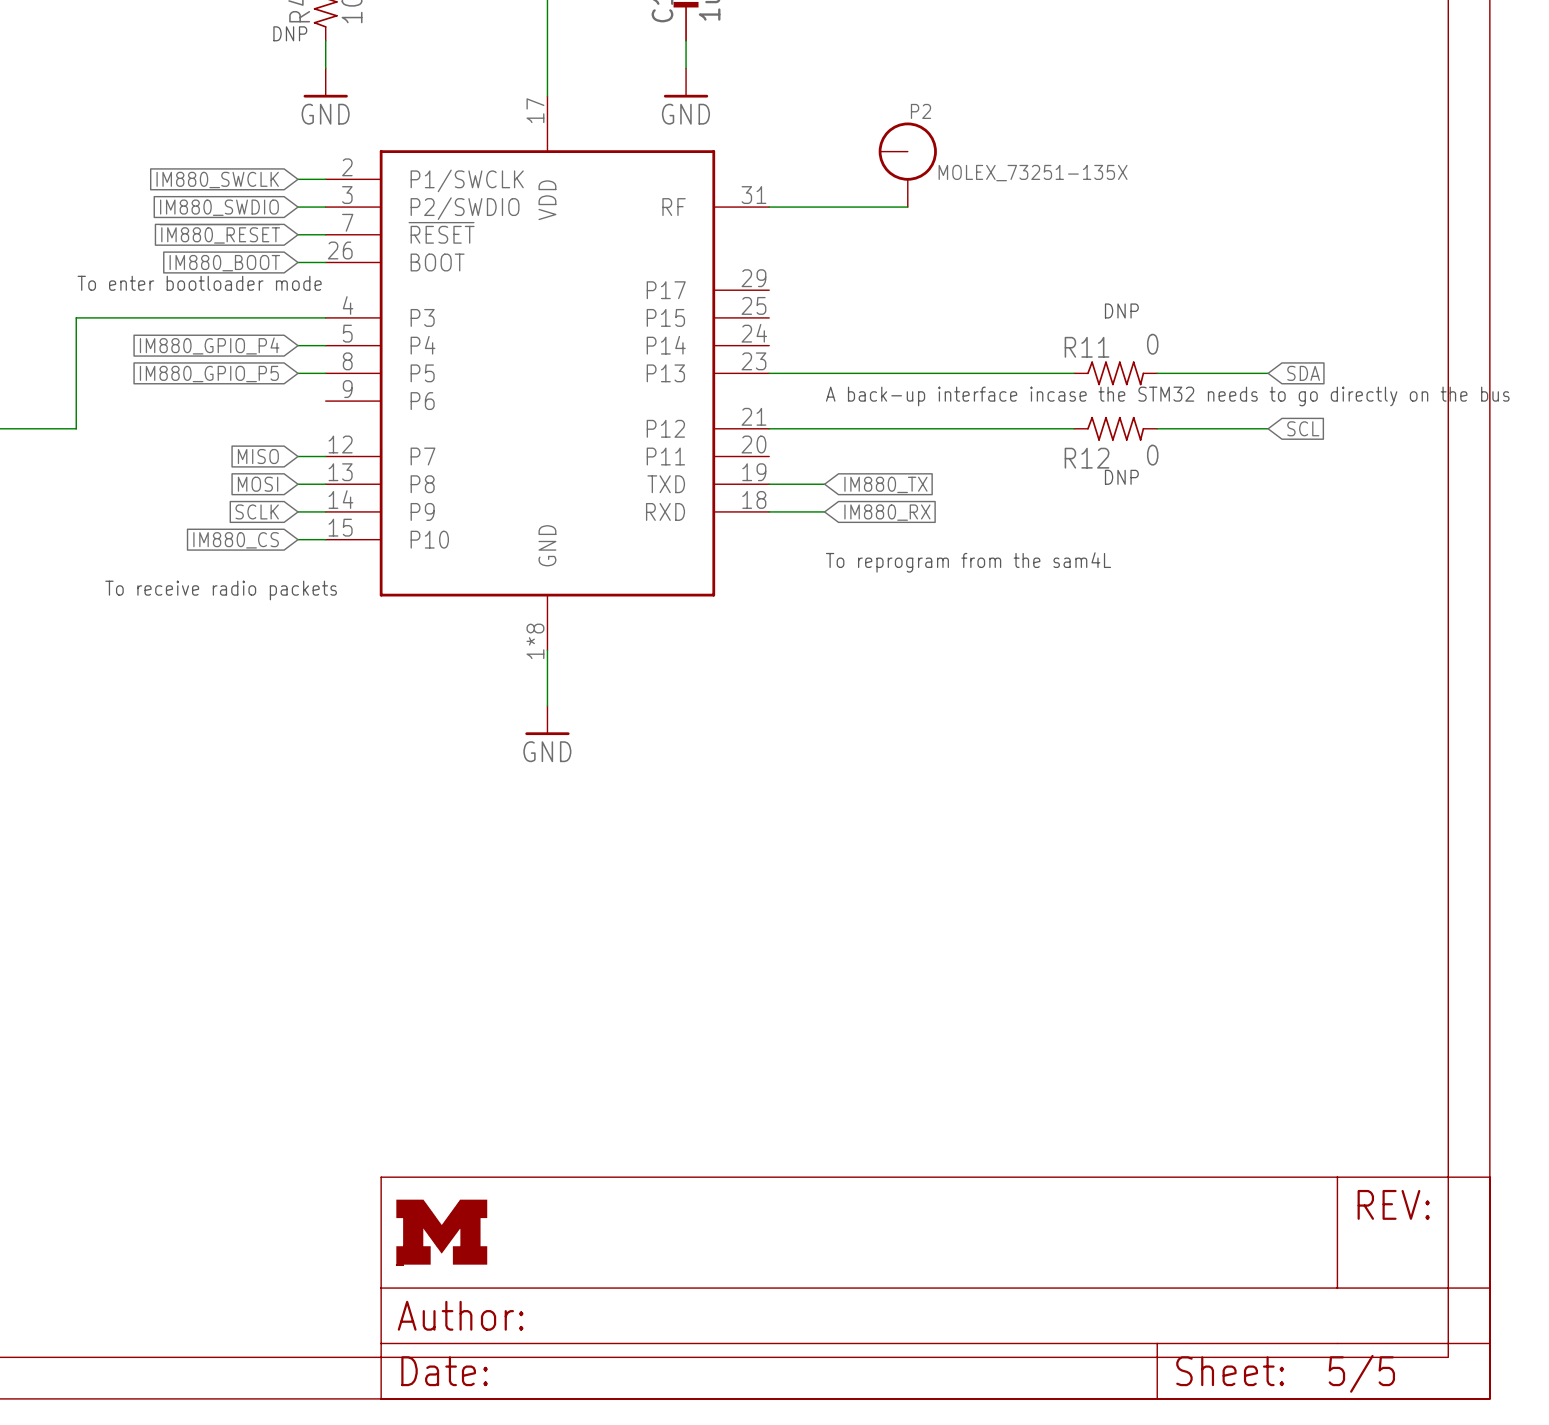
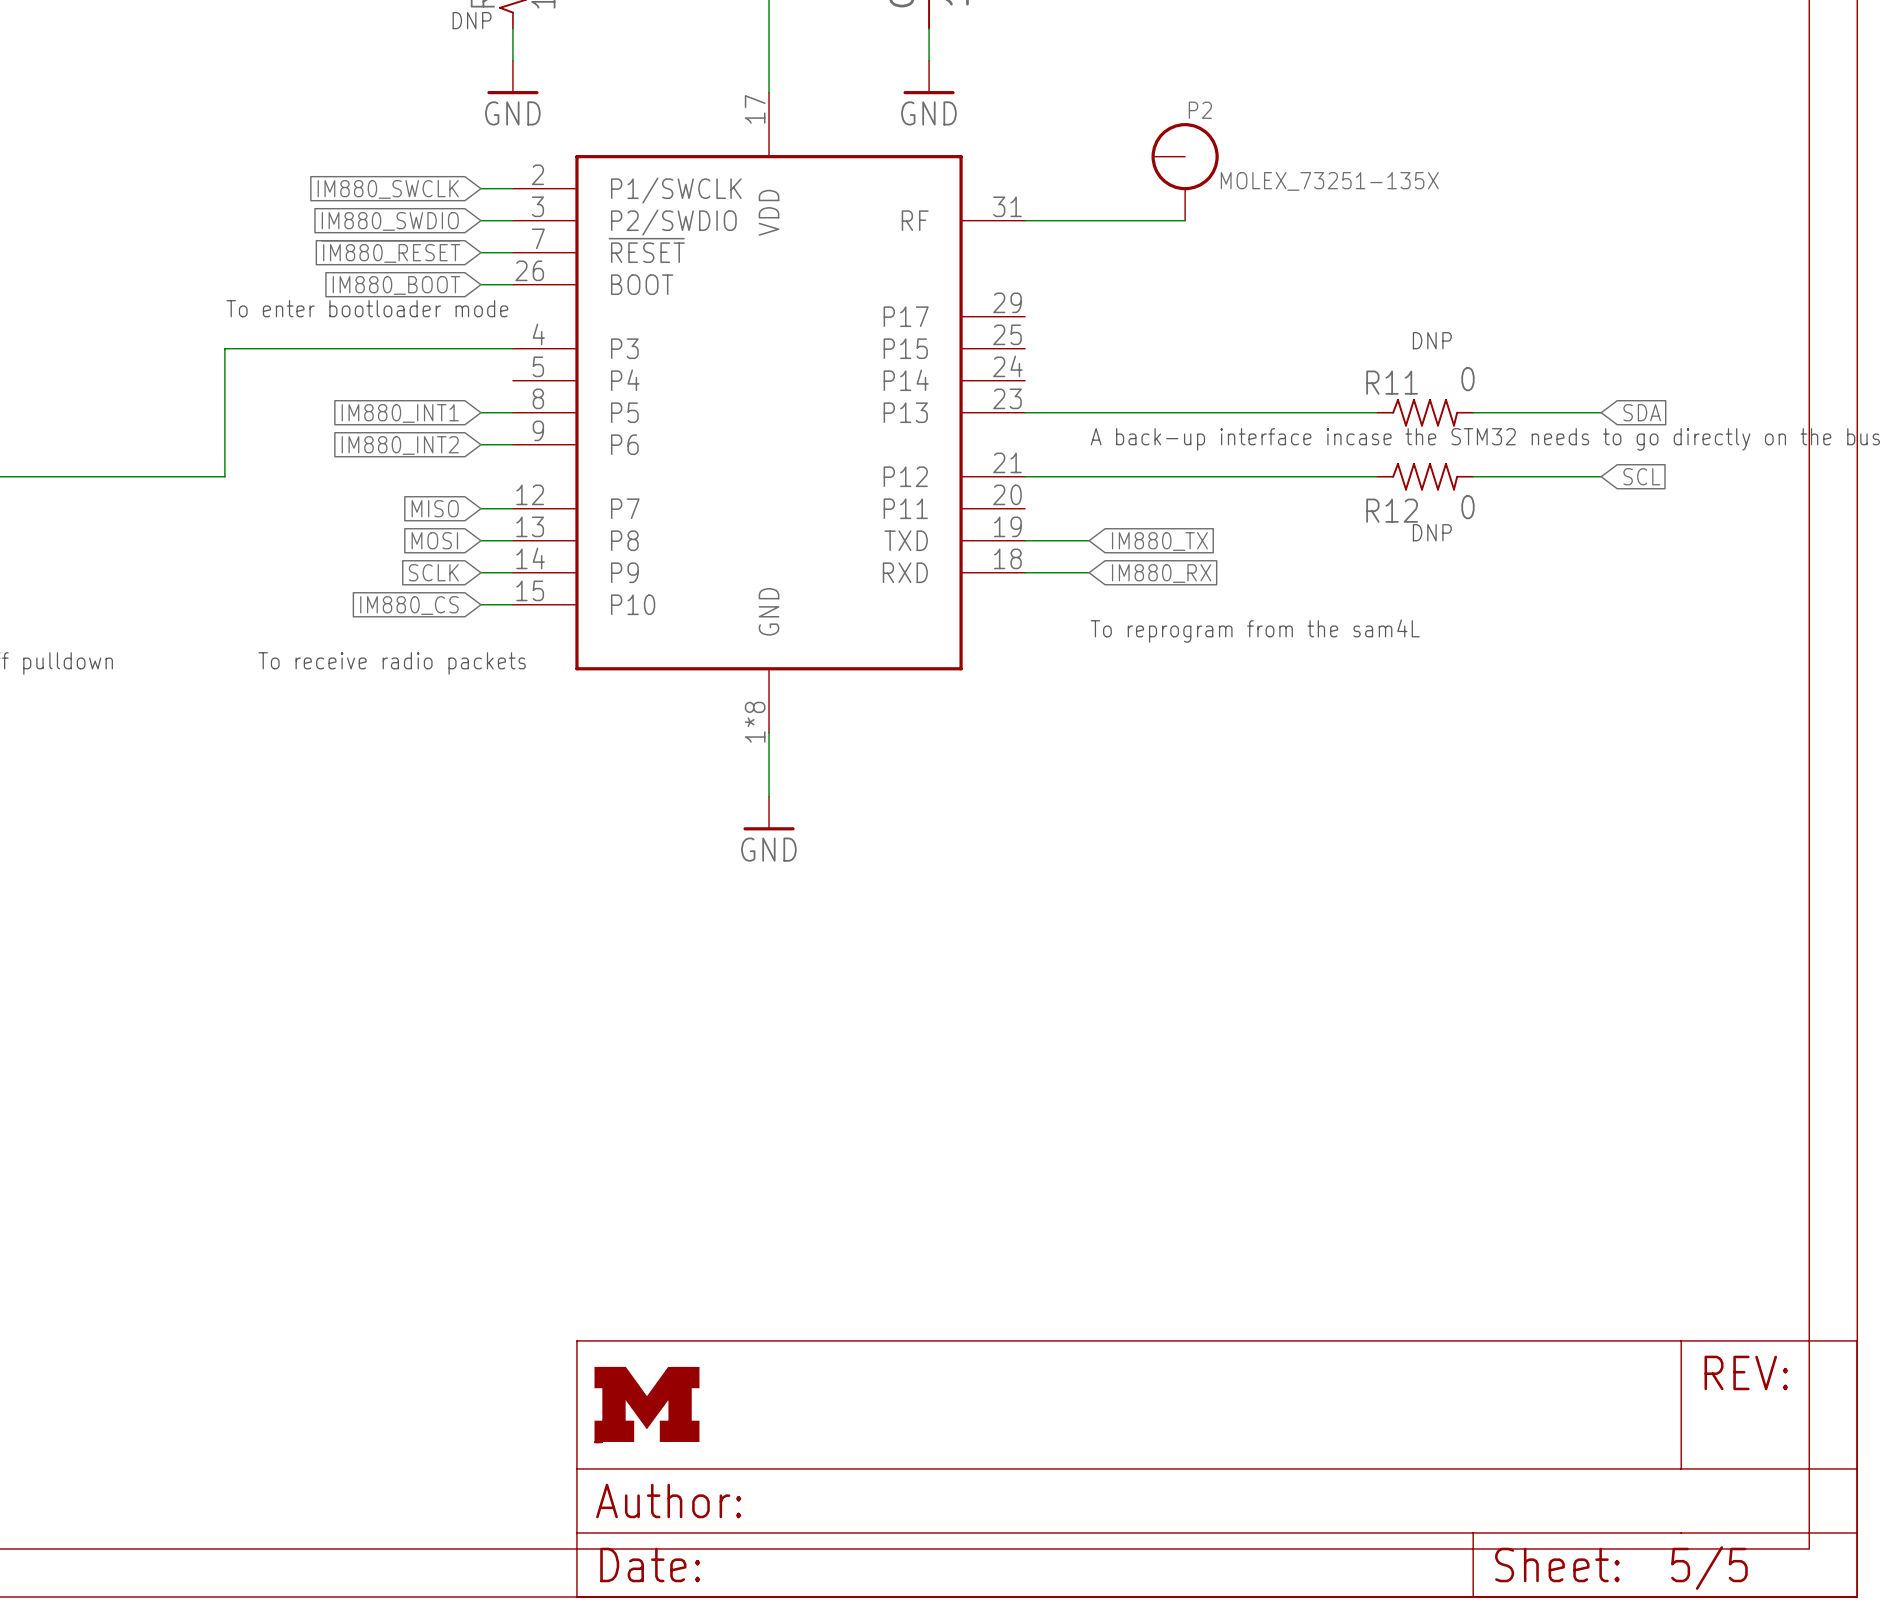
global label: IM880_GPIO_P4 (209, 345) -> none
wire: (297, 345) (325, 345) -> (480, 444) (512, 444)
global label: IM880_GPIO_P5 (209, 374) -> IM880_INT1 (400, 413)
global label: none -> IM880_INT2 (400, 445)

